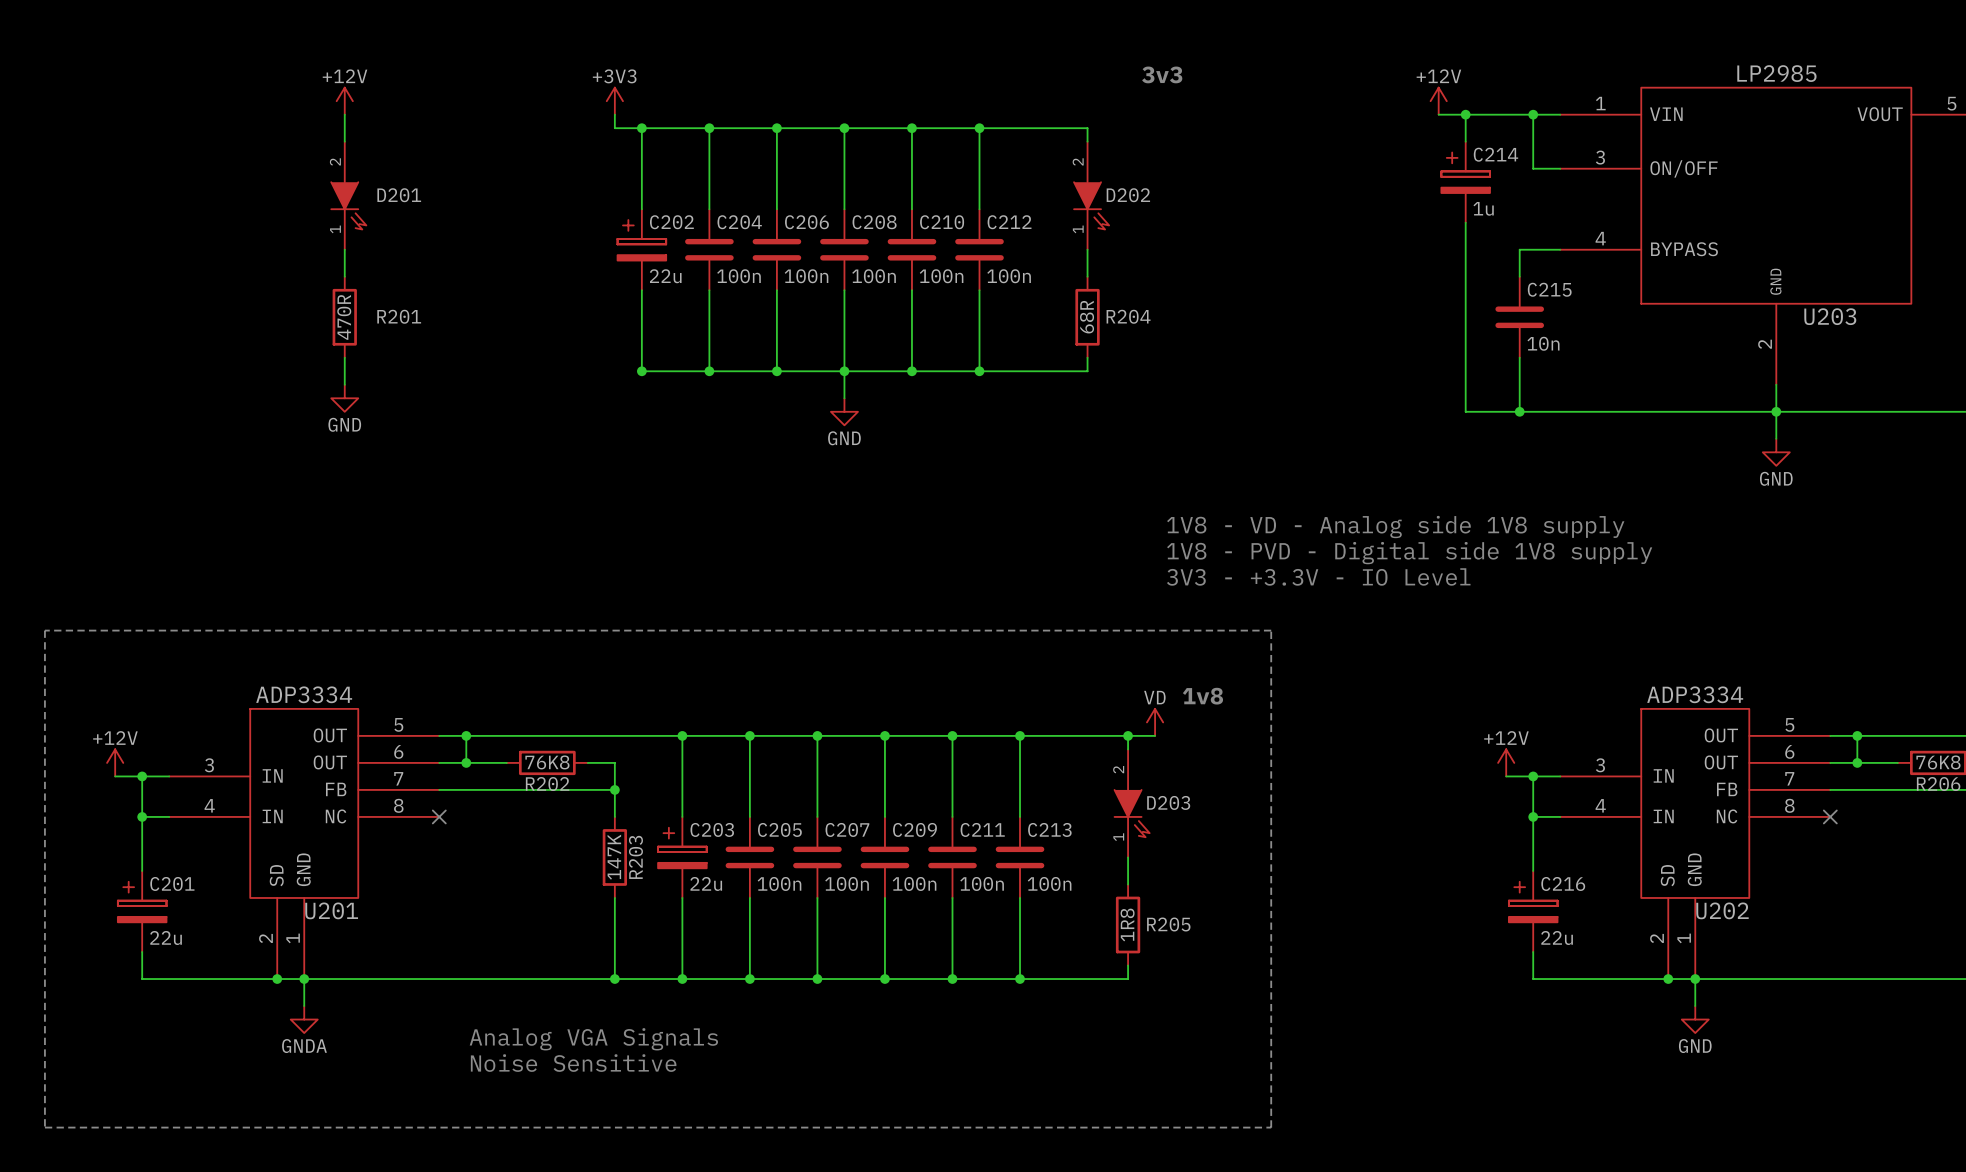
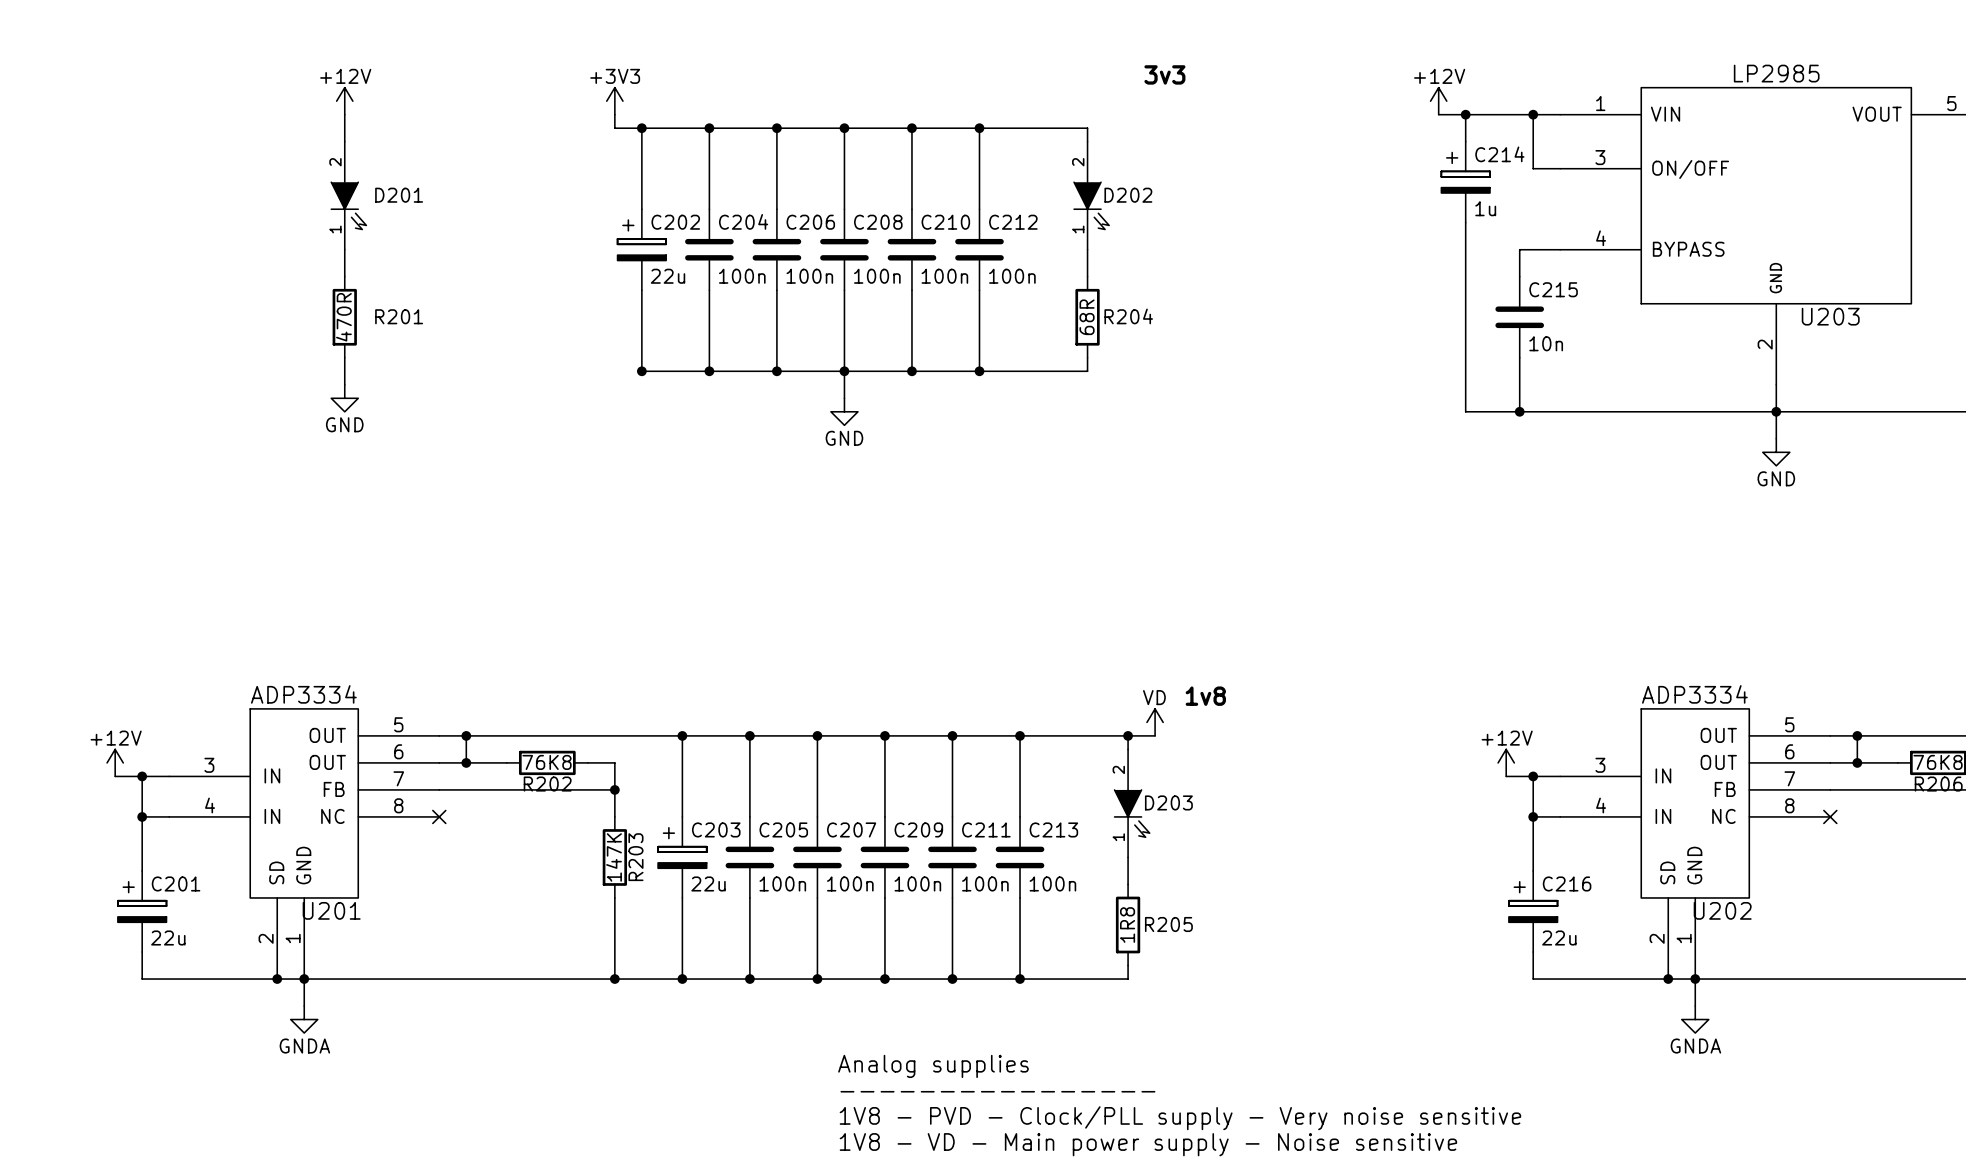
text: 1V8 - VD - Analog side 1V8 supply (1395, 527) -> none
text: 1V8 - PVD - Digital side 1V8 supply (1409, 553) -> none
text: 3V3 - +3.3V - IO Level (1318, 576) -> none
line: (44, 630) (44, 1127) (1271, 1127) (1271, 630) (44, 630) -> none
power symbol: GND (1695, 1019) -> GNDA (1695, 1019)
text: Analog VGA Signals (593, 1039) -> none
text: Noise Sensitive (573, 1063) -> none
text: none -> Analog supplies (933, 1066)
text: none -> ---------------- (997, 1091)
text: none -> 1V8 - PVD - Clock/PLL supply - Very noise sensitive (1180, 1118)
text: none -> 1V8 - VD - Main power supply - Noise sensitive (1148, 1144)

